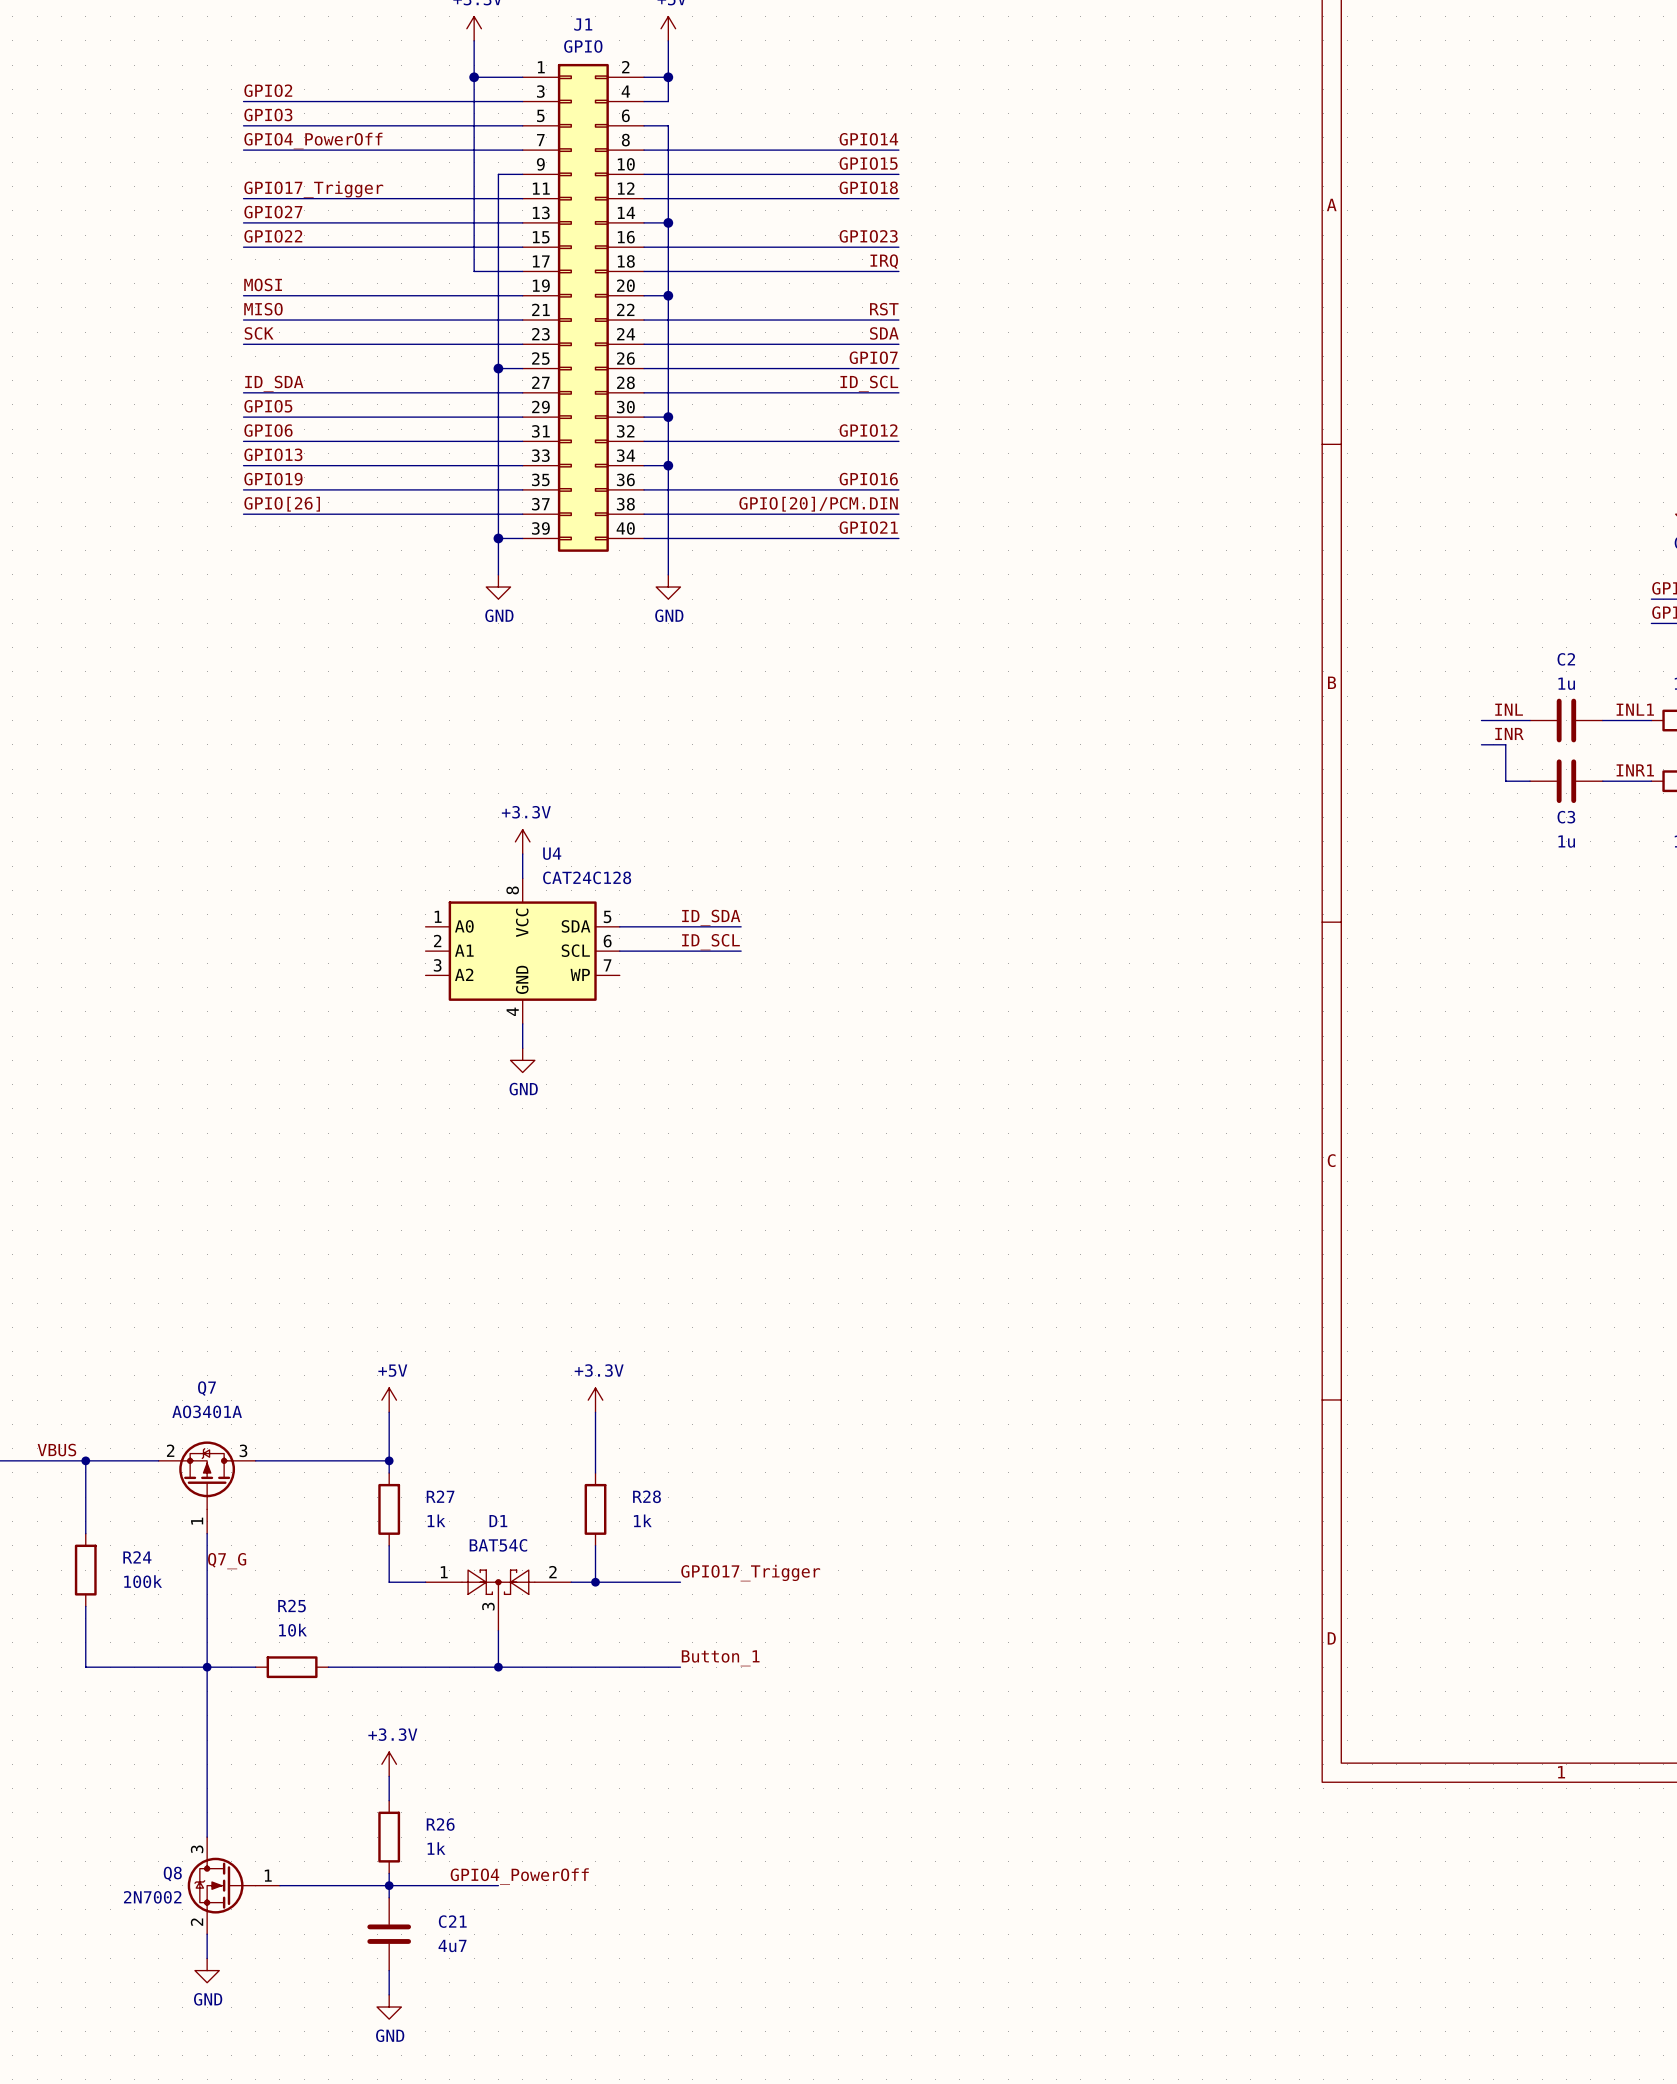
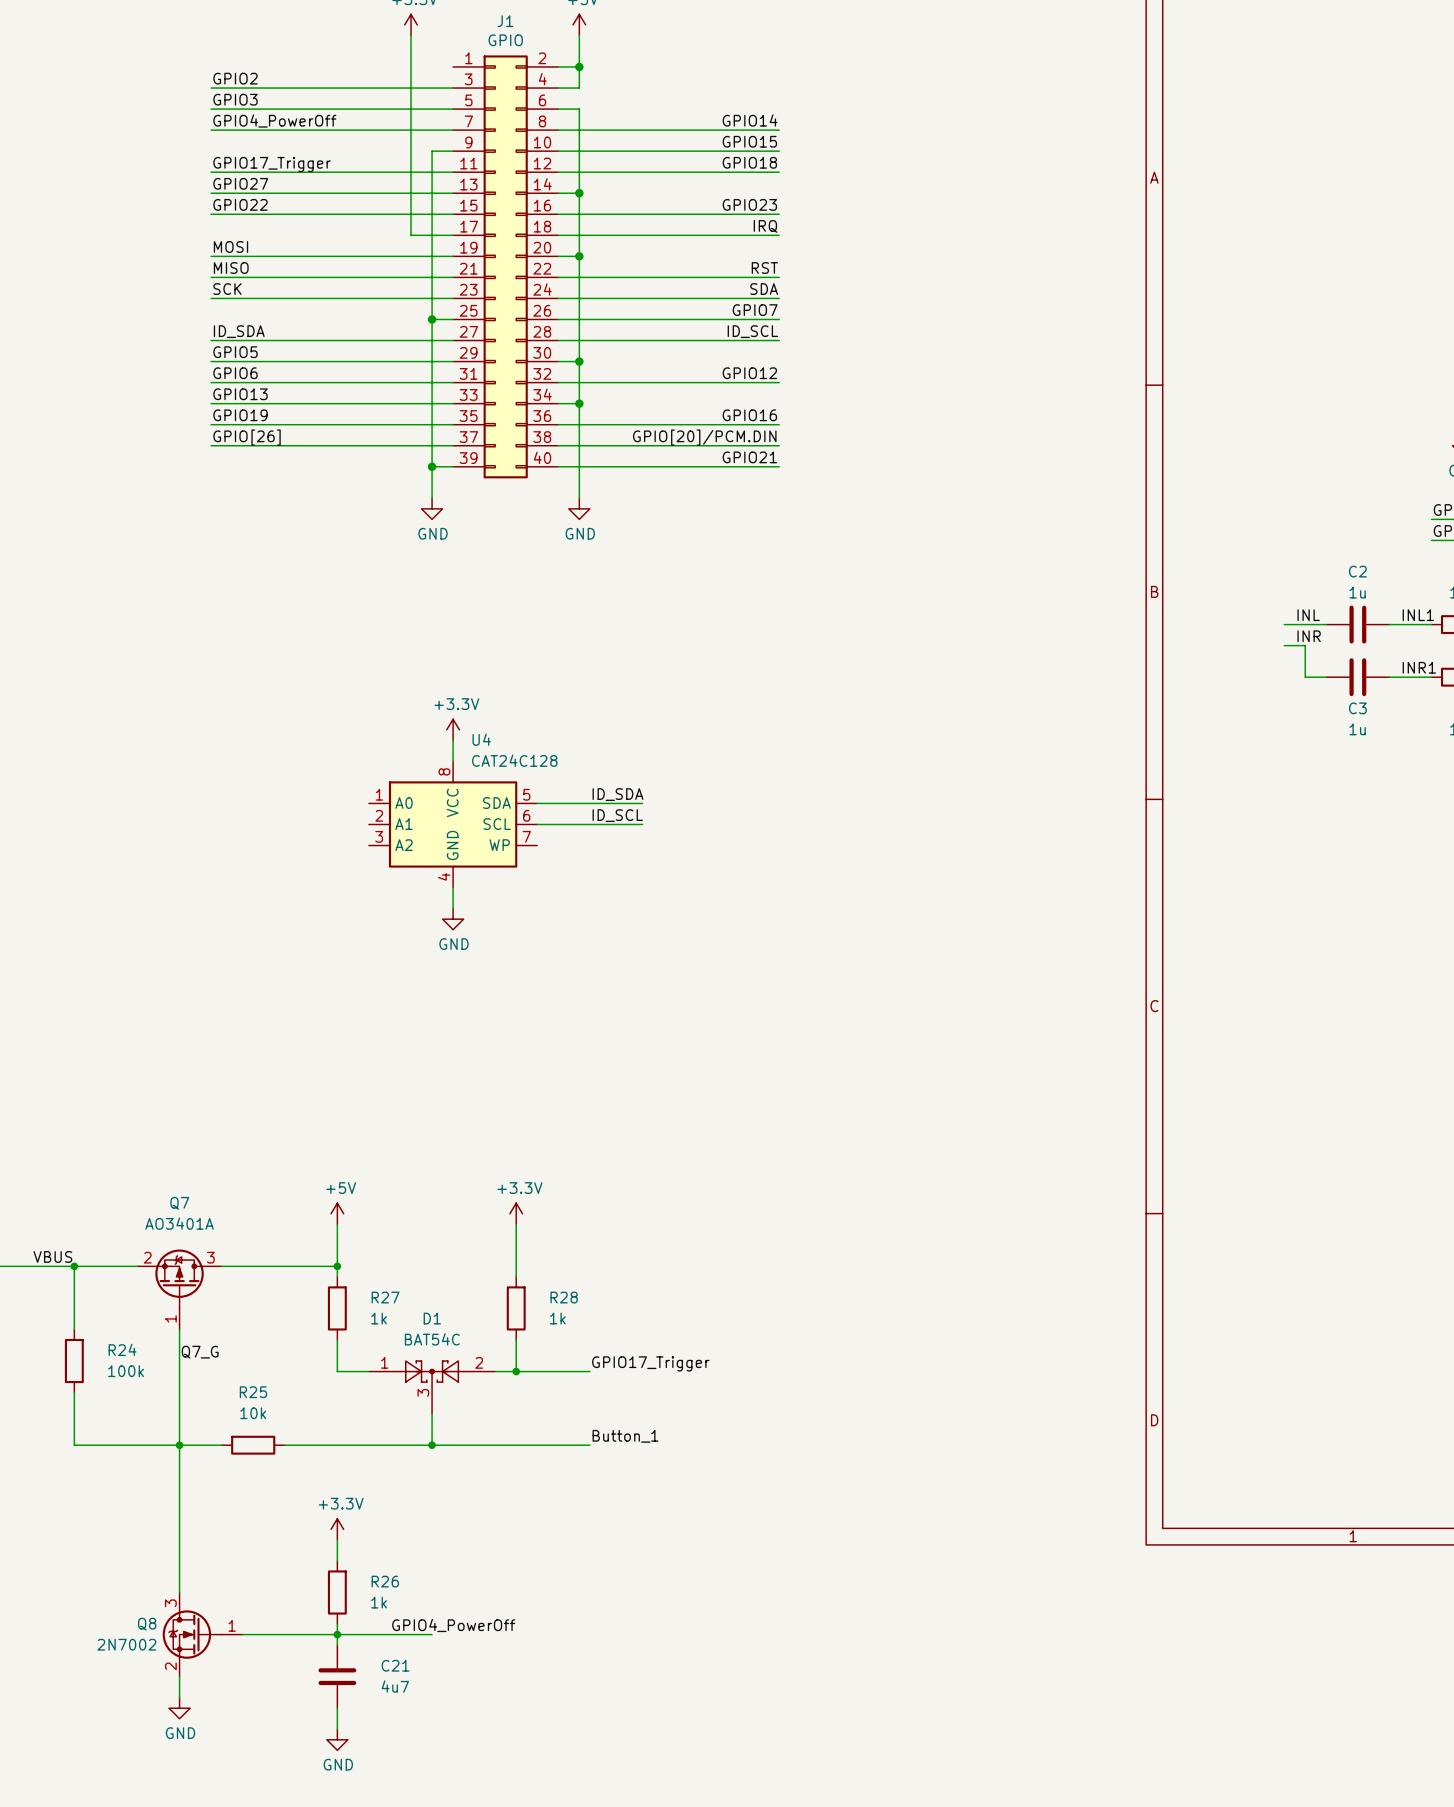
wire: (474, 77) (522, 77) -> none
junction: (474, 77) -> none

